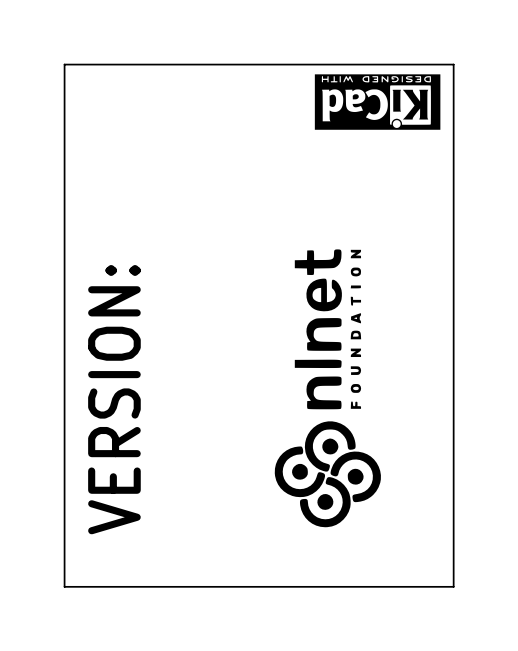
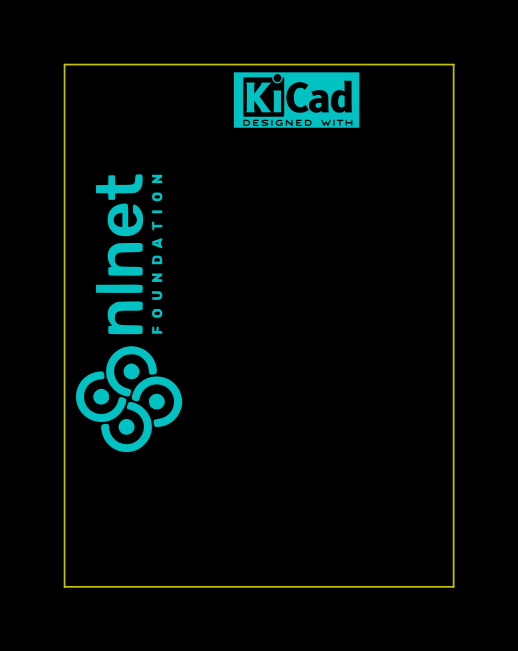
drawing: none -> [233, 72, 360, 128]
drawing: [314, 74, 441, 130] -> none
drawing position: (327, 388) -> (129, 313)
text: VERSION: (114, 399) -> none

